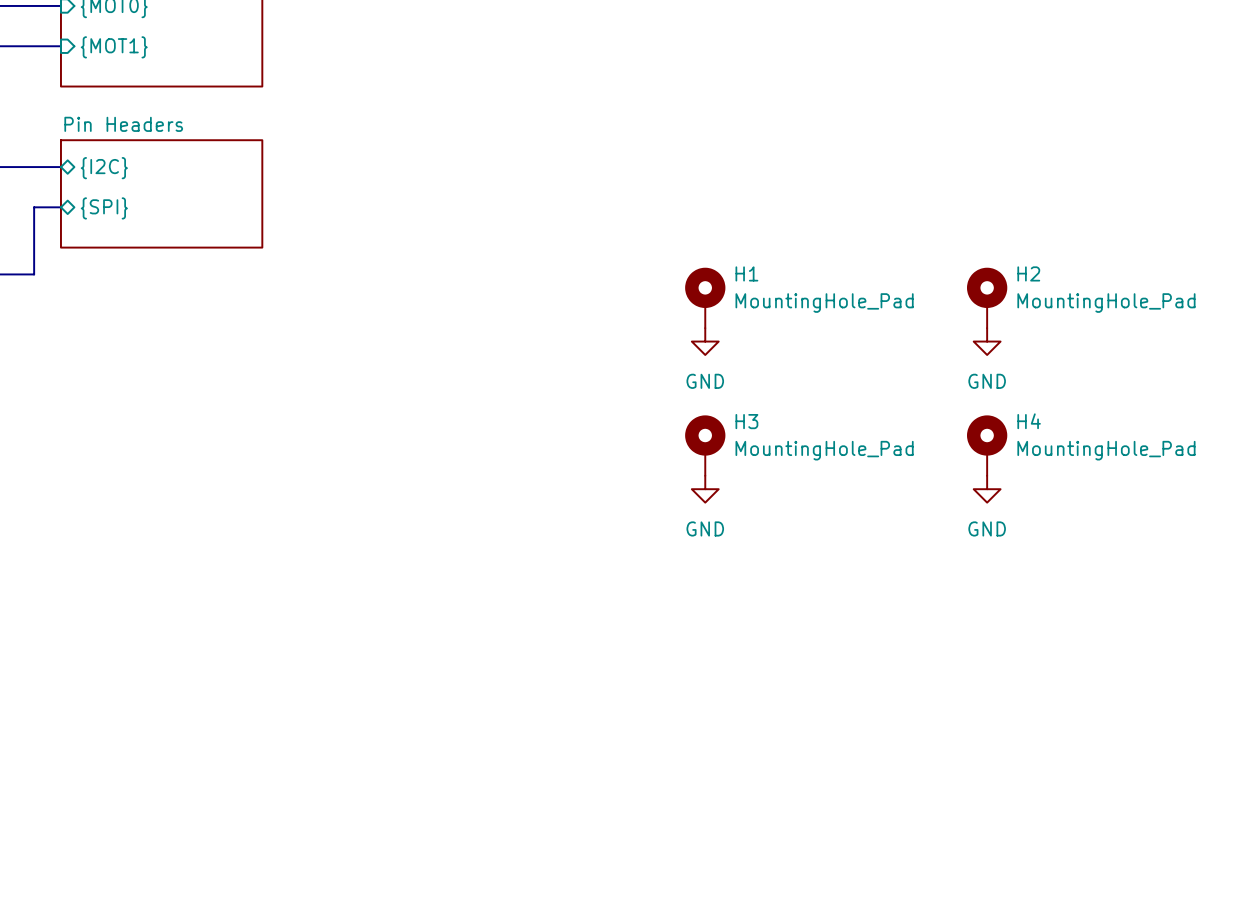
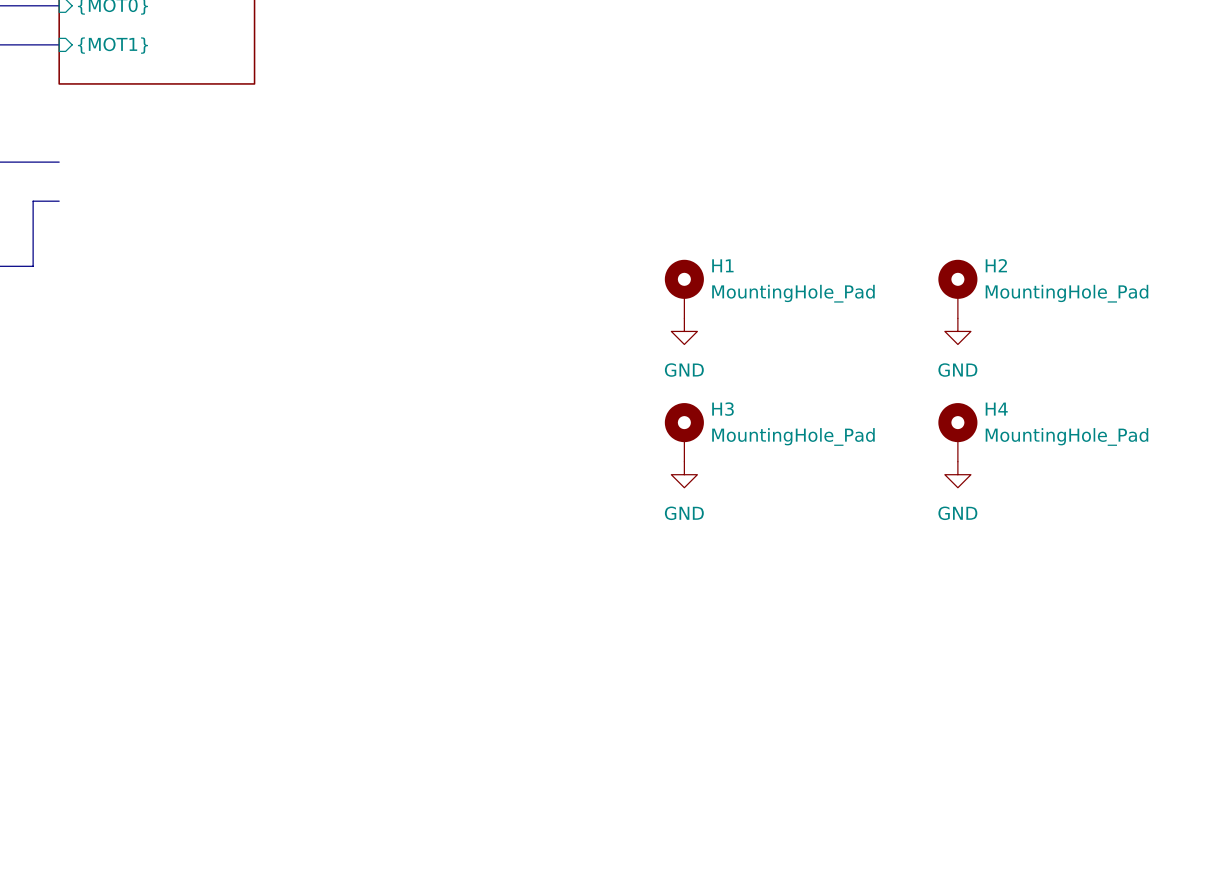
sheet pin: {I2C} (104, 168) -> none
sheet Pin Headers: (161, 193) -> none
sheet pin: {SPI} (104, 208) -> none

